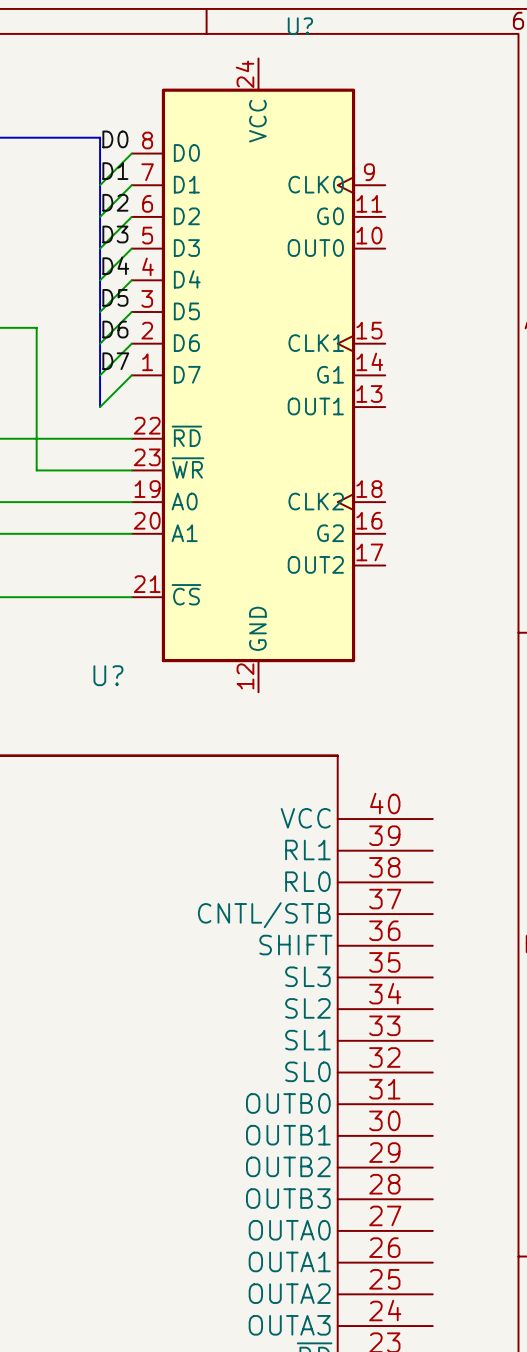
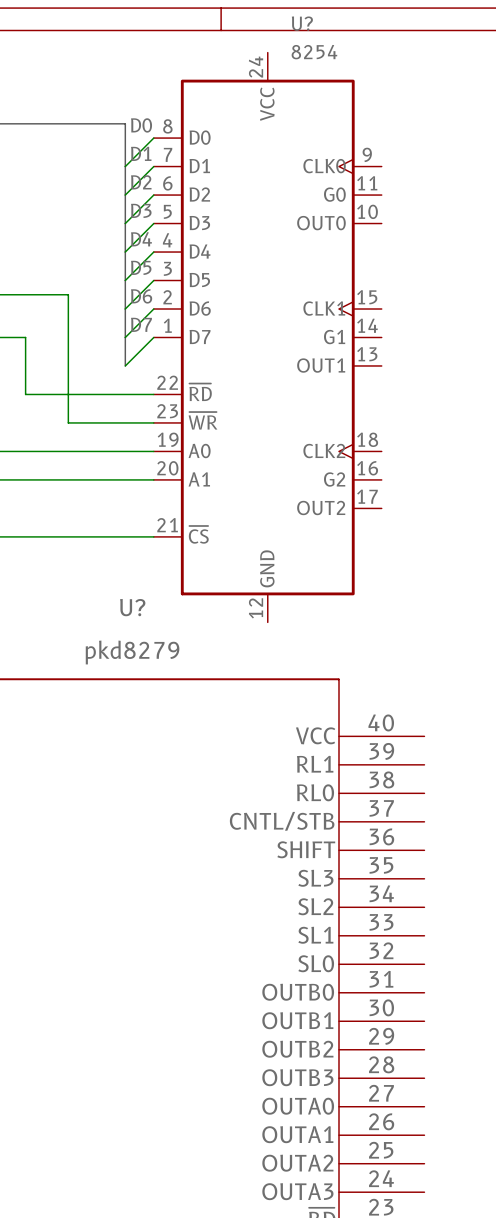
U? value: none -> 8254 (314, 52)
U? value: none -> pkd8279 (132, 652)

